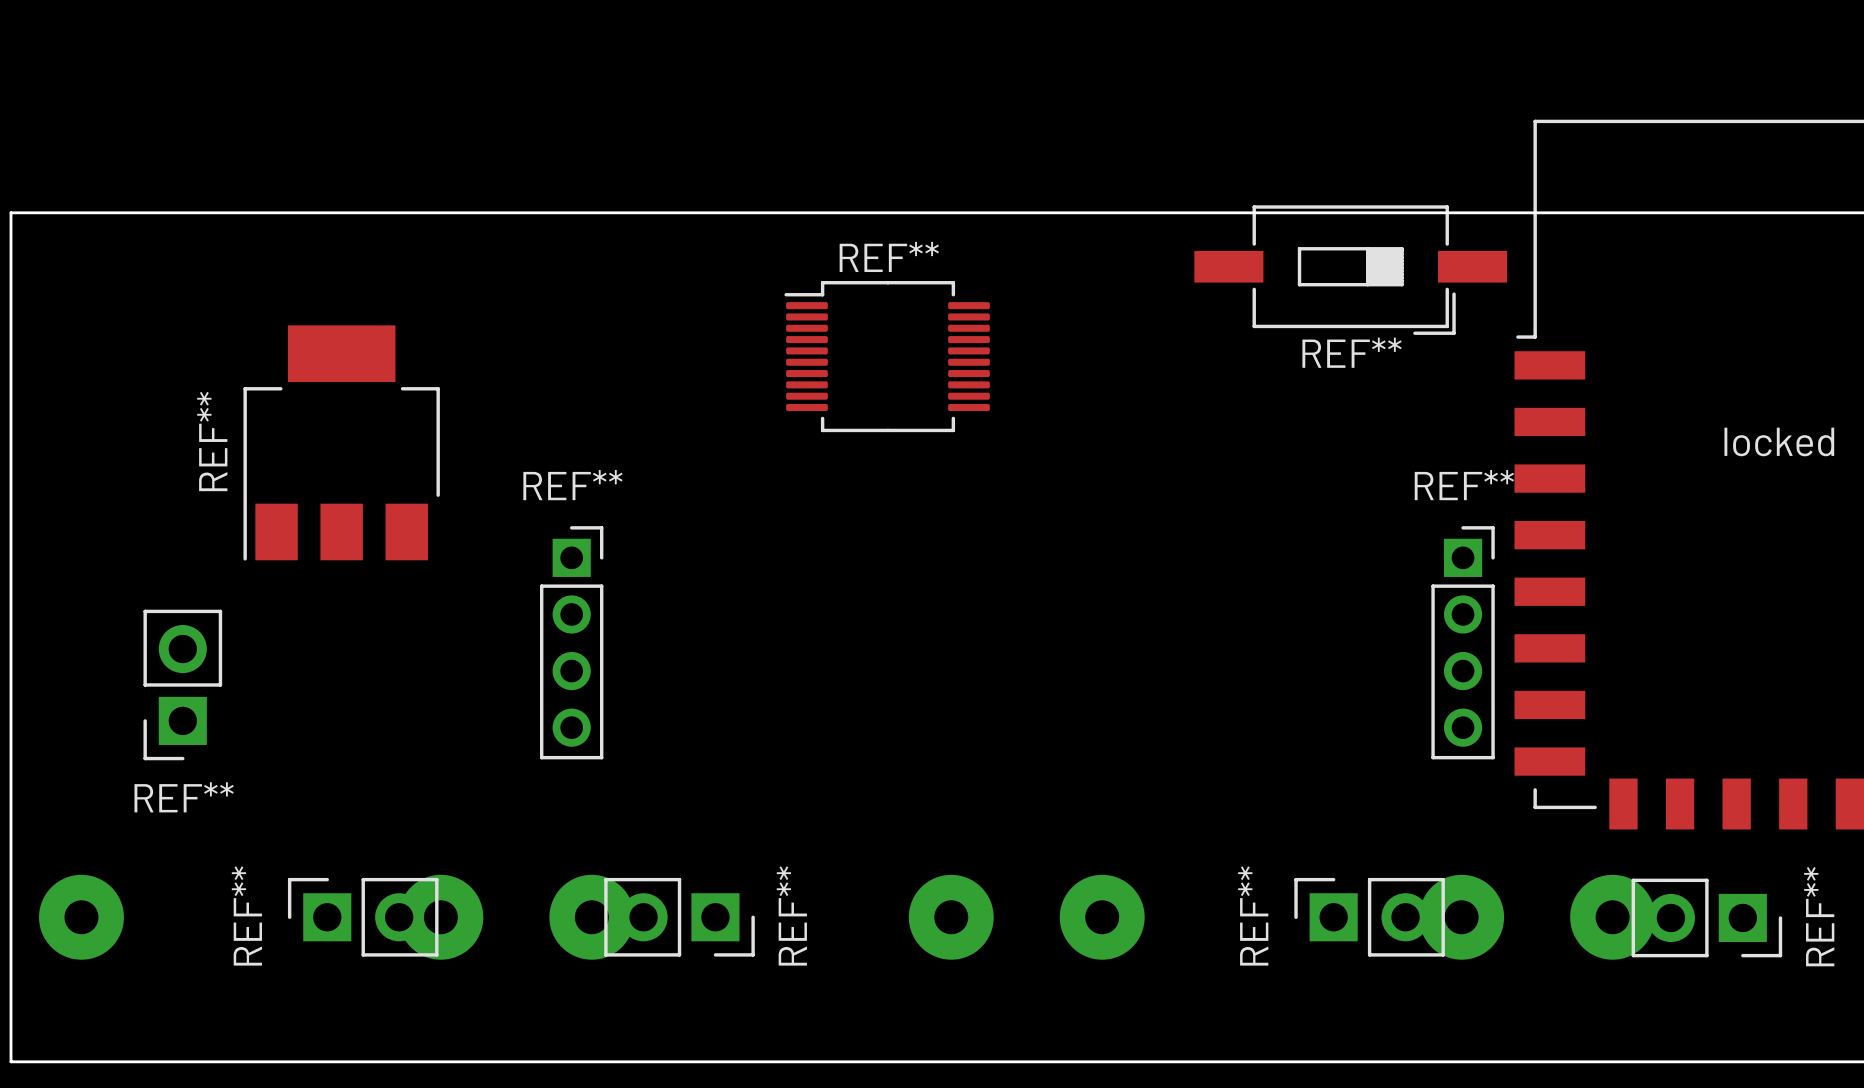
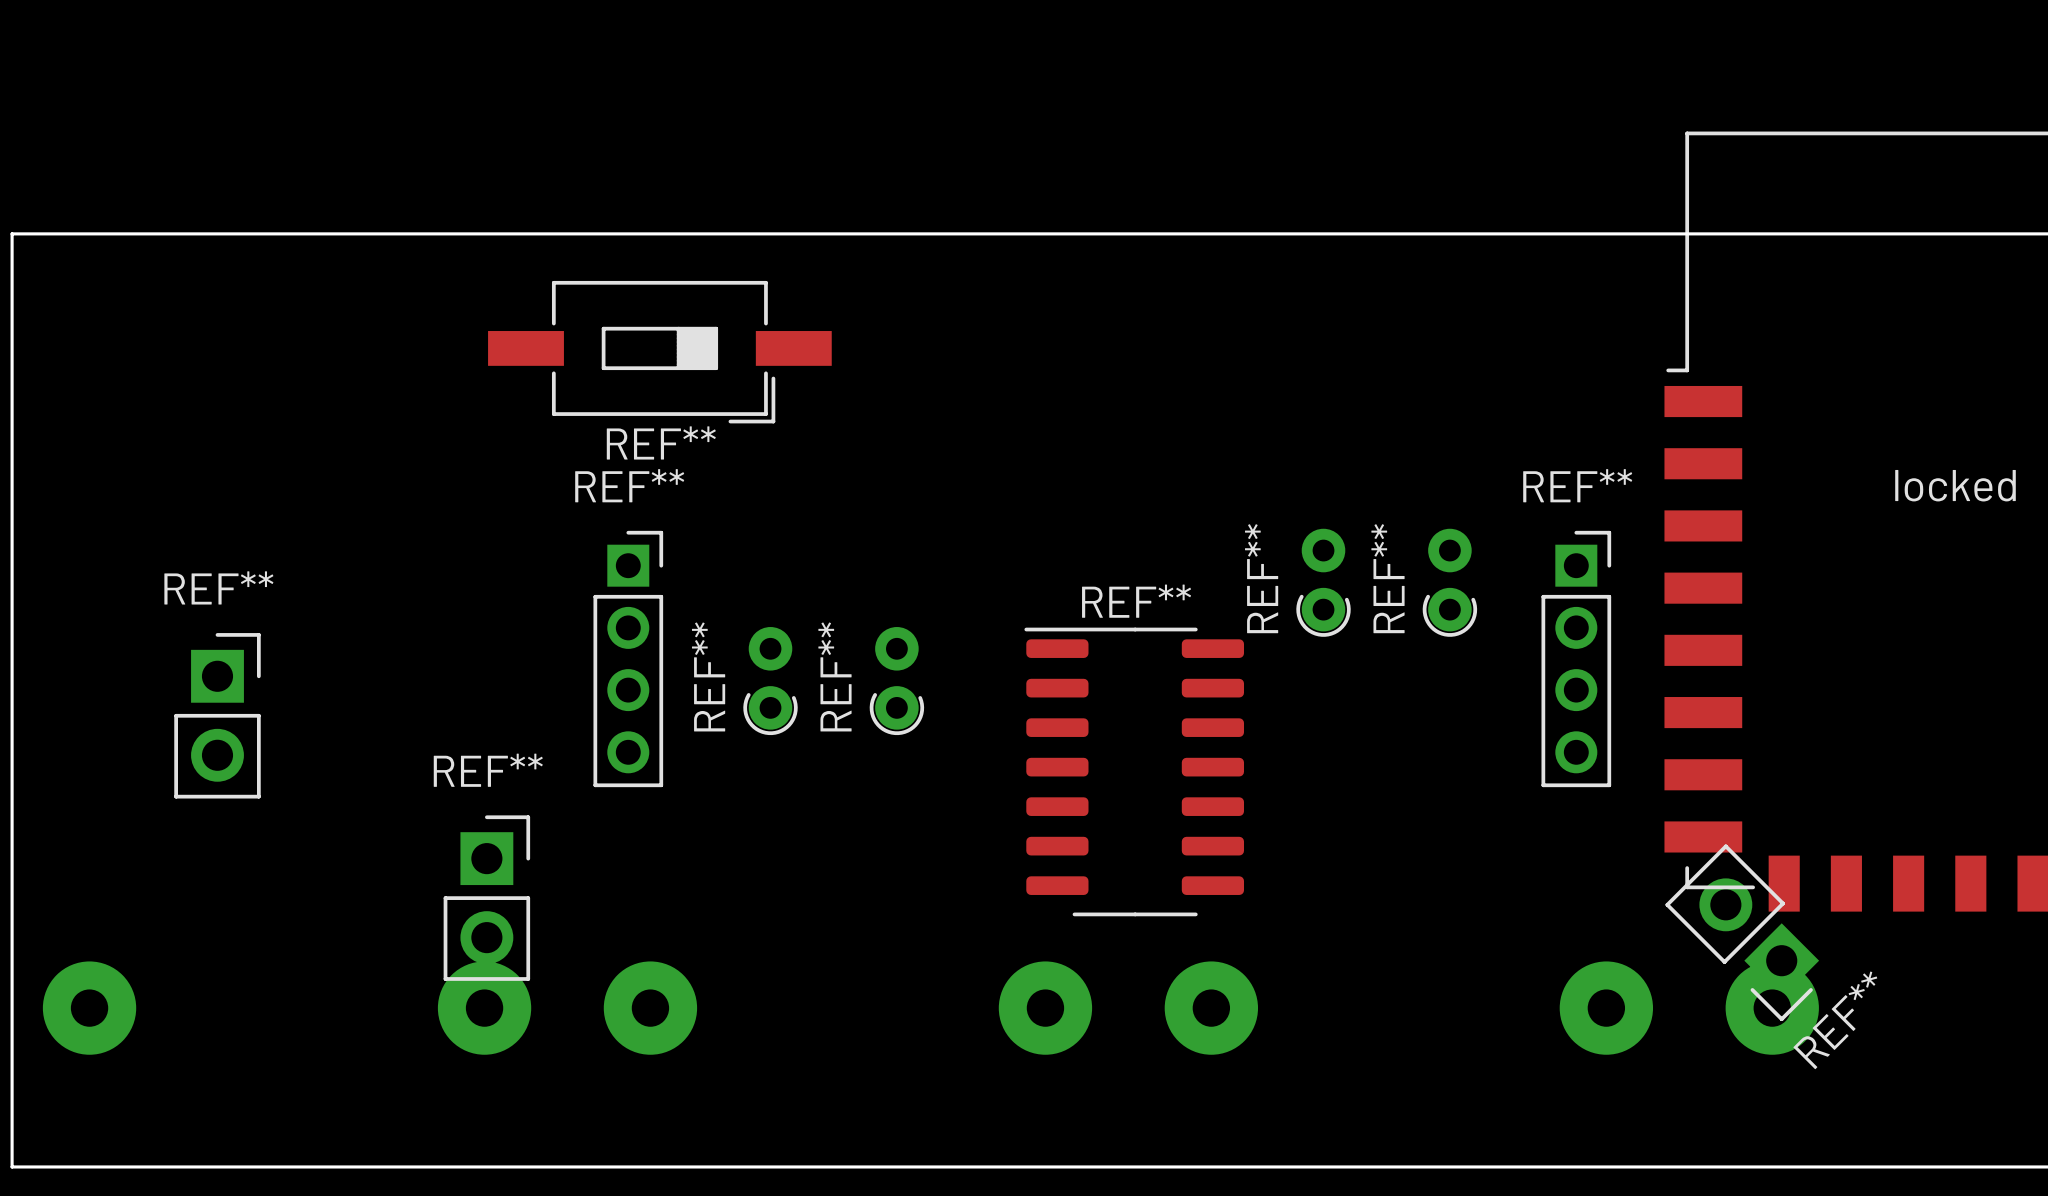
REF**: (1350, 270) -> none
REF**: none -> (659, 352)
REF**: (887, 356) -> none
REF**: (341, 442) -> none
REF**: none -> (1323, 582)
REF**: none -> (1449, 582)
REF**: none -> (770, 681)
REF**: none -> (896, 681)
REF** position: (571, 642) -> (628, 658)
REF** position: (1463, 642) -> (1576, 658)
REF** rotation: 0° (182, 684) -> 180° (217, 715)
REF**: none -> (1134, 771)
REF**: none -> (1742, 932)
REF** rotation: 0° (363, 917) -> 90° clockwise (486, 898)
REF** position: (363, 917) -> (486, 898)
REF**: (679, 917) -> none
REF**: (1369, 917) -> none
REF**: (1706, 917) -> none

